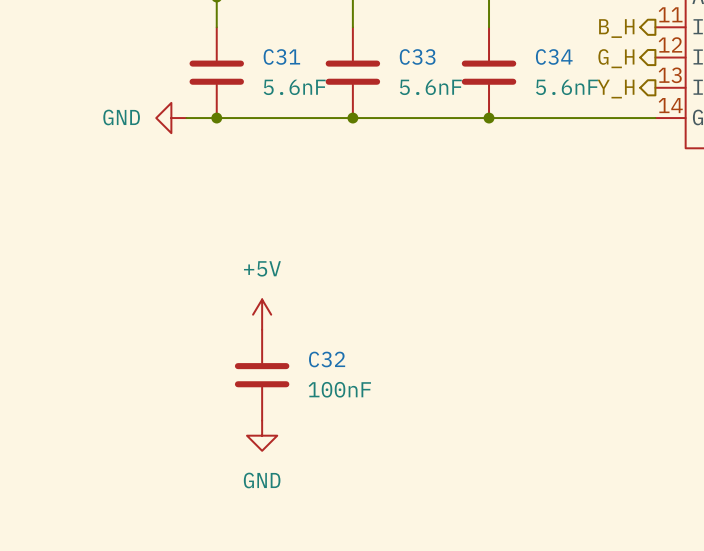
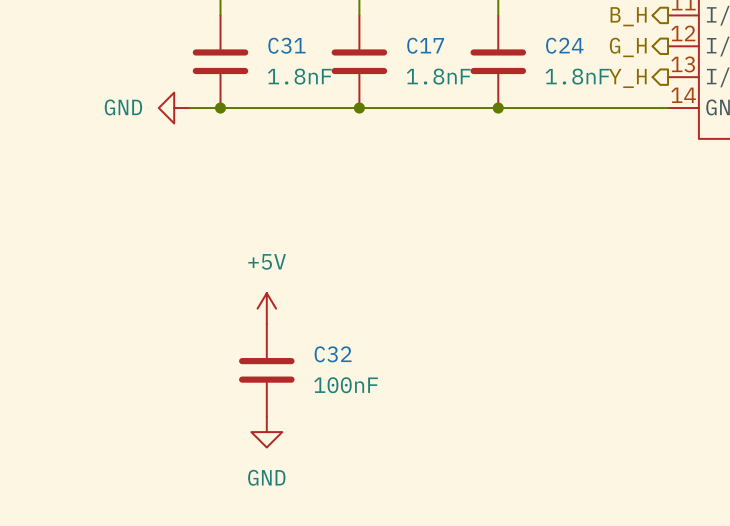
C33 name: C33 (417, 56) -> C17 (425, 45)
C34 name: C34 (554, 56) -> C24 (564, 45)
C31 value: 5.6nF (294, 87) -> 1.8nF (299, 76)
C33 value: 5.6nF (430, 87) -> 1.8nF (438, 76)
C34 value: 5.6nF (566, 87) -> 1.8nF (577, 76)

